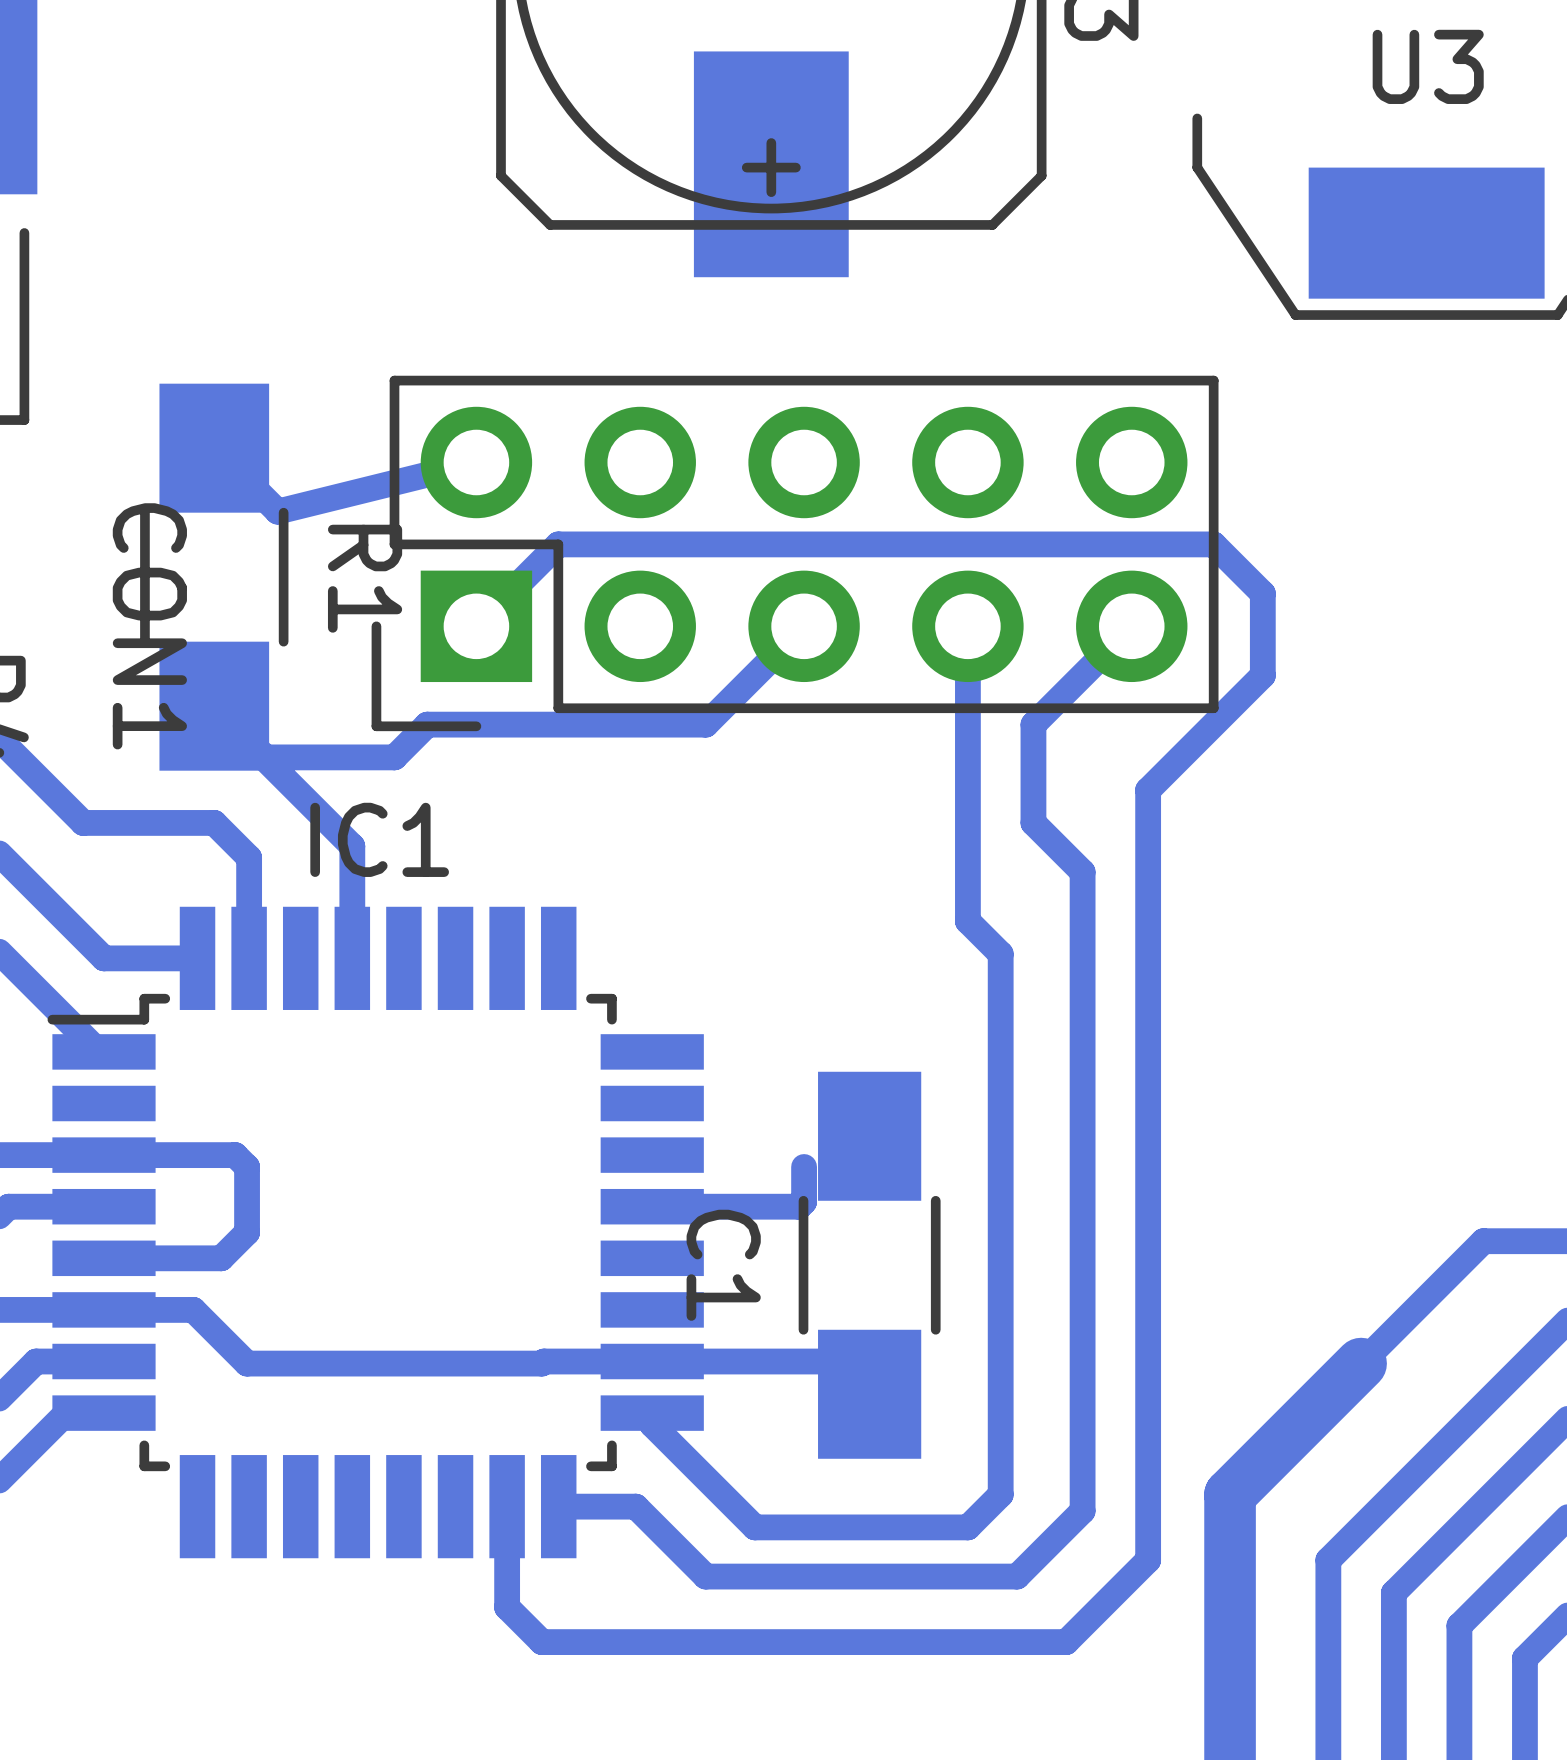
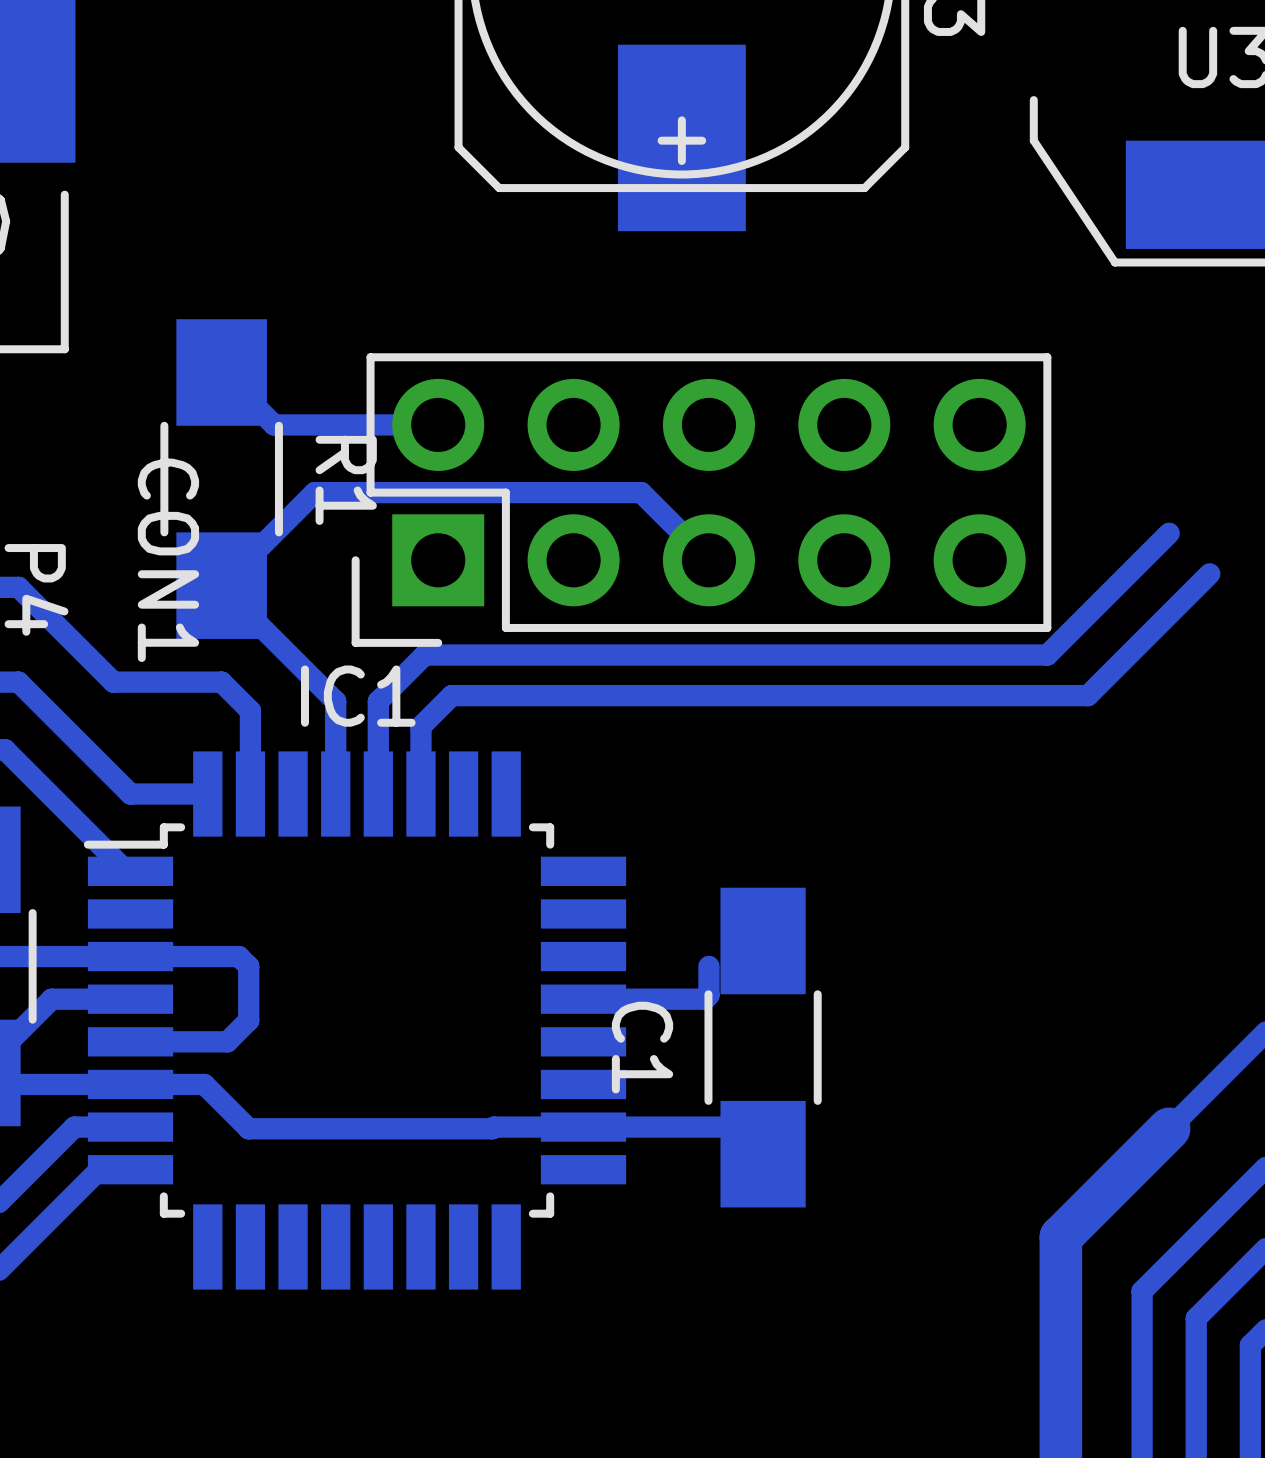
bottom track: (476, 462) (277, 511) -> (438, 424) (274, 424)
CON1 position: (795, 553) -> (701, 500)
bottom track: (476, 626) (558, 544) (1213, 544) (1262, 593) (1262, 675) (1148, 790) (1148, 1560) (1066, 1642) (541, 1642) (507, 1607) (507, 1506) -> none
bottom track: (804, 626) (705, 724) (427, 724) (394, 757) (265, 757) (214, 706) -> (708, 560) (641, 492) (314, 492) (221, 585)
bottom track: (967, 626) (967, 921) (1000, 953) (1000, 1494) (967, 1527) (754, 1527) (652, 1424) (652, 1413) -> none
bottom track: (1131, 626) (1033, 724) (1033, 822) (1082, 872) (1082, 1511) (1017, 1576) (705, 1576) (635, 1506) (558, 1506) -> none
bottom track: none -> (1169, 533) (1047, 655) (424, 655) (378, 701) (378, 794)
bottom track: none -> (1209, 573) (1087, 695) (451, 695) (420, 726) (420, 794)

